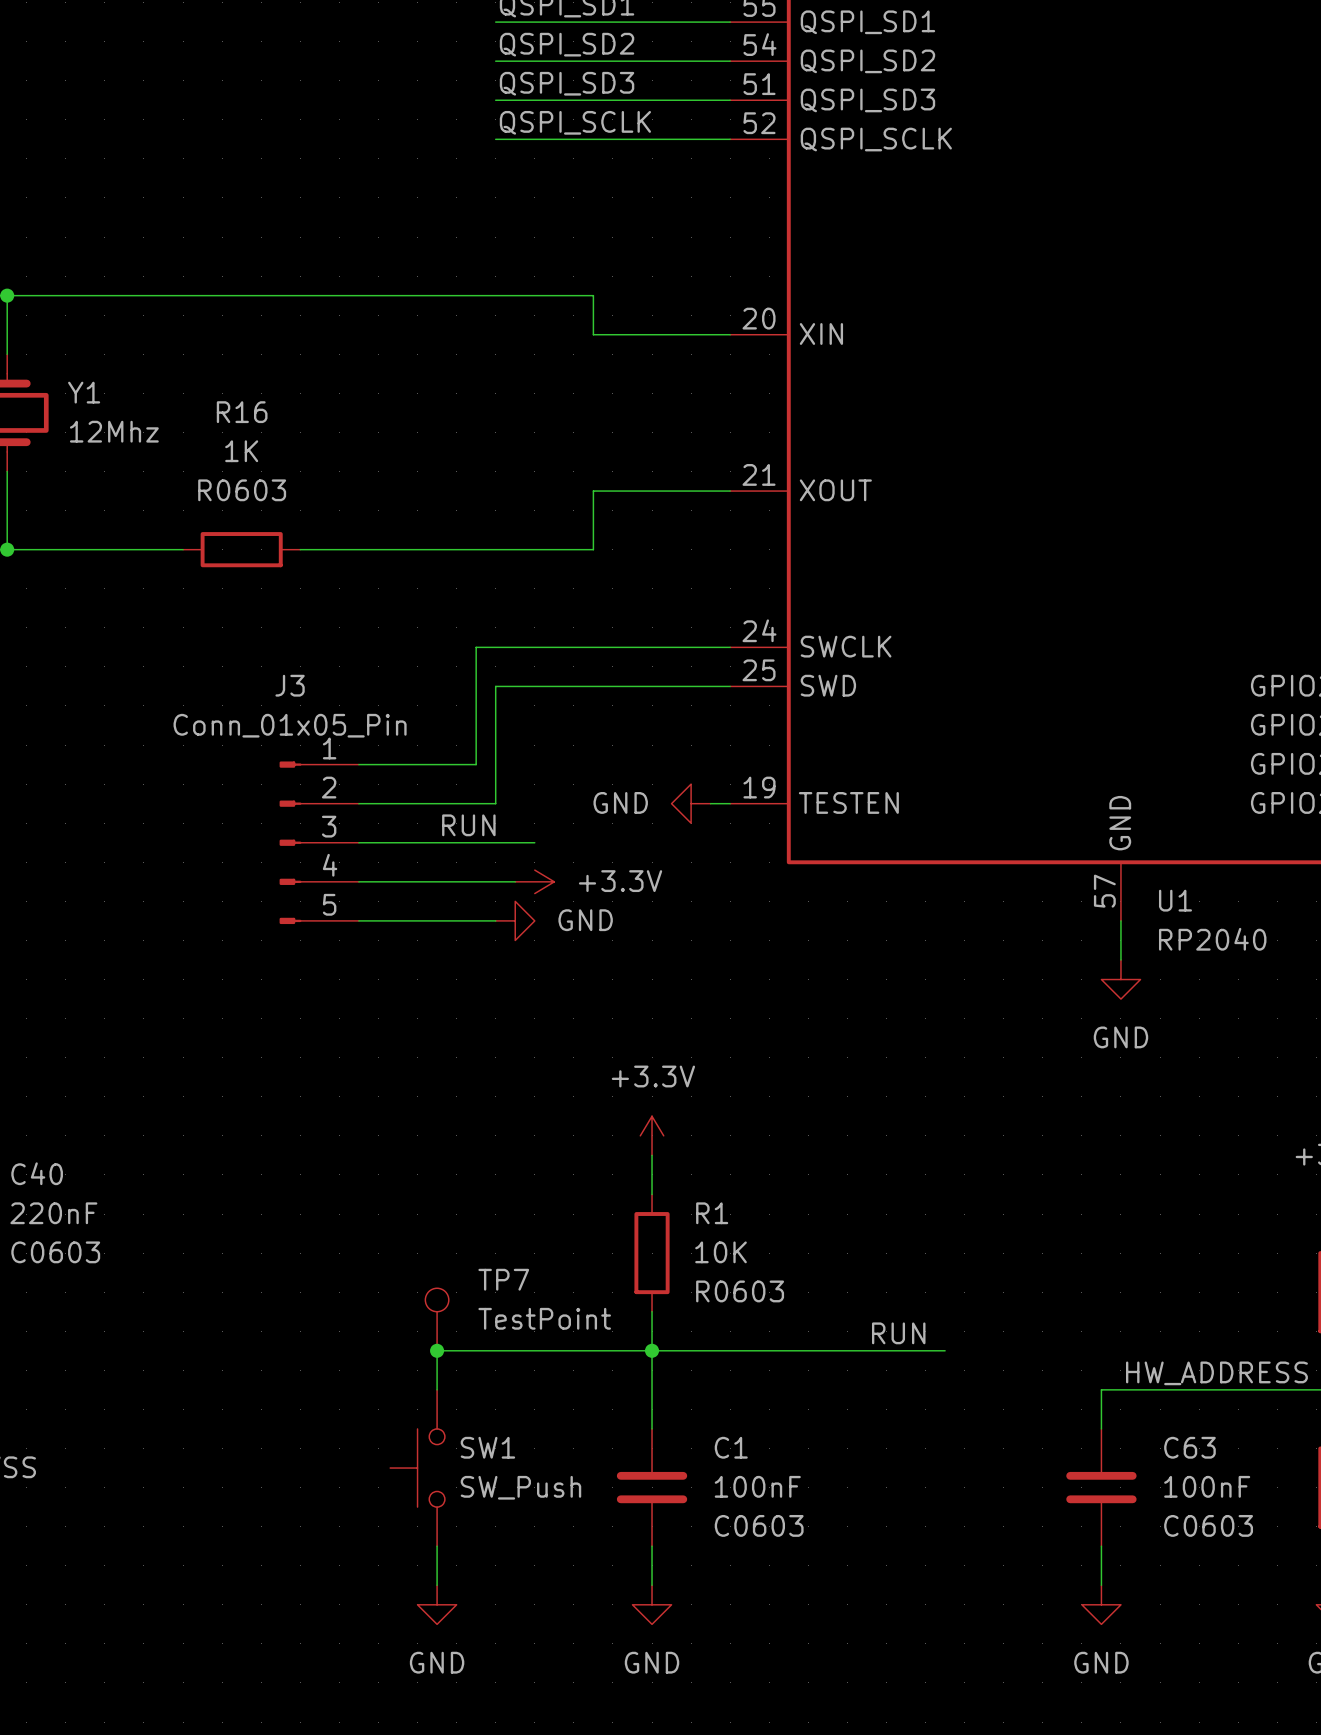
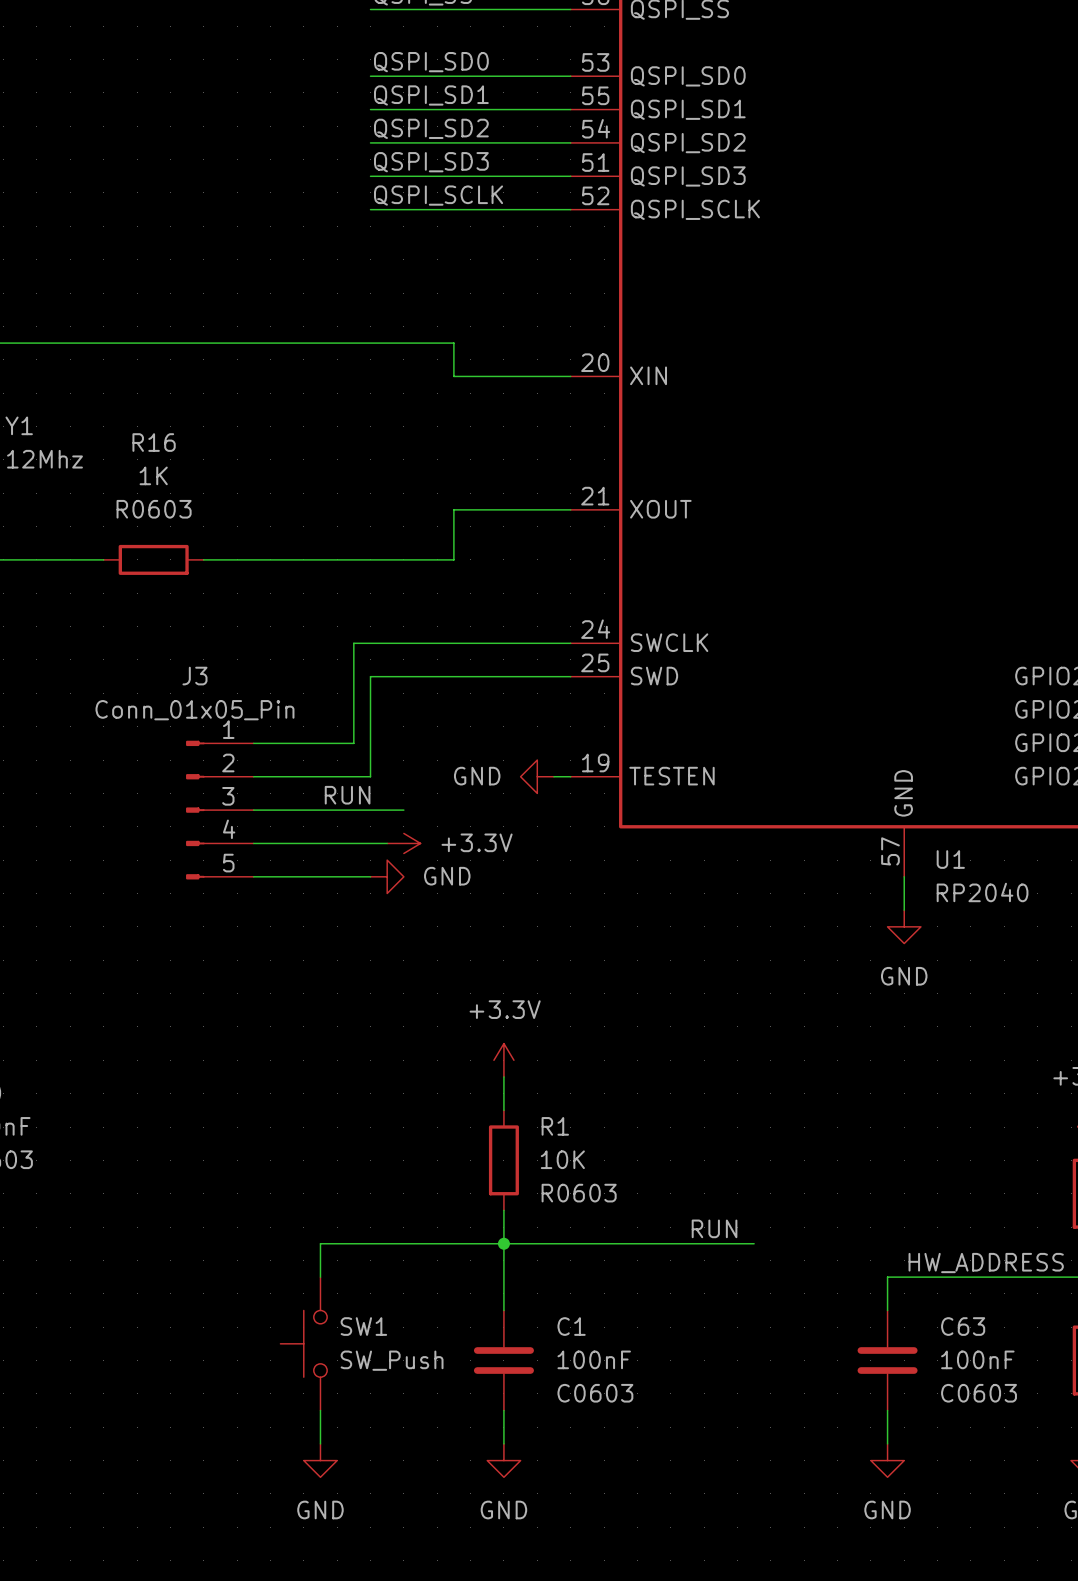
TP7: TestPoint (437, 1319) -> none
junction: (437, 1350) -> none

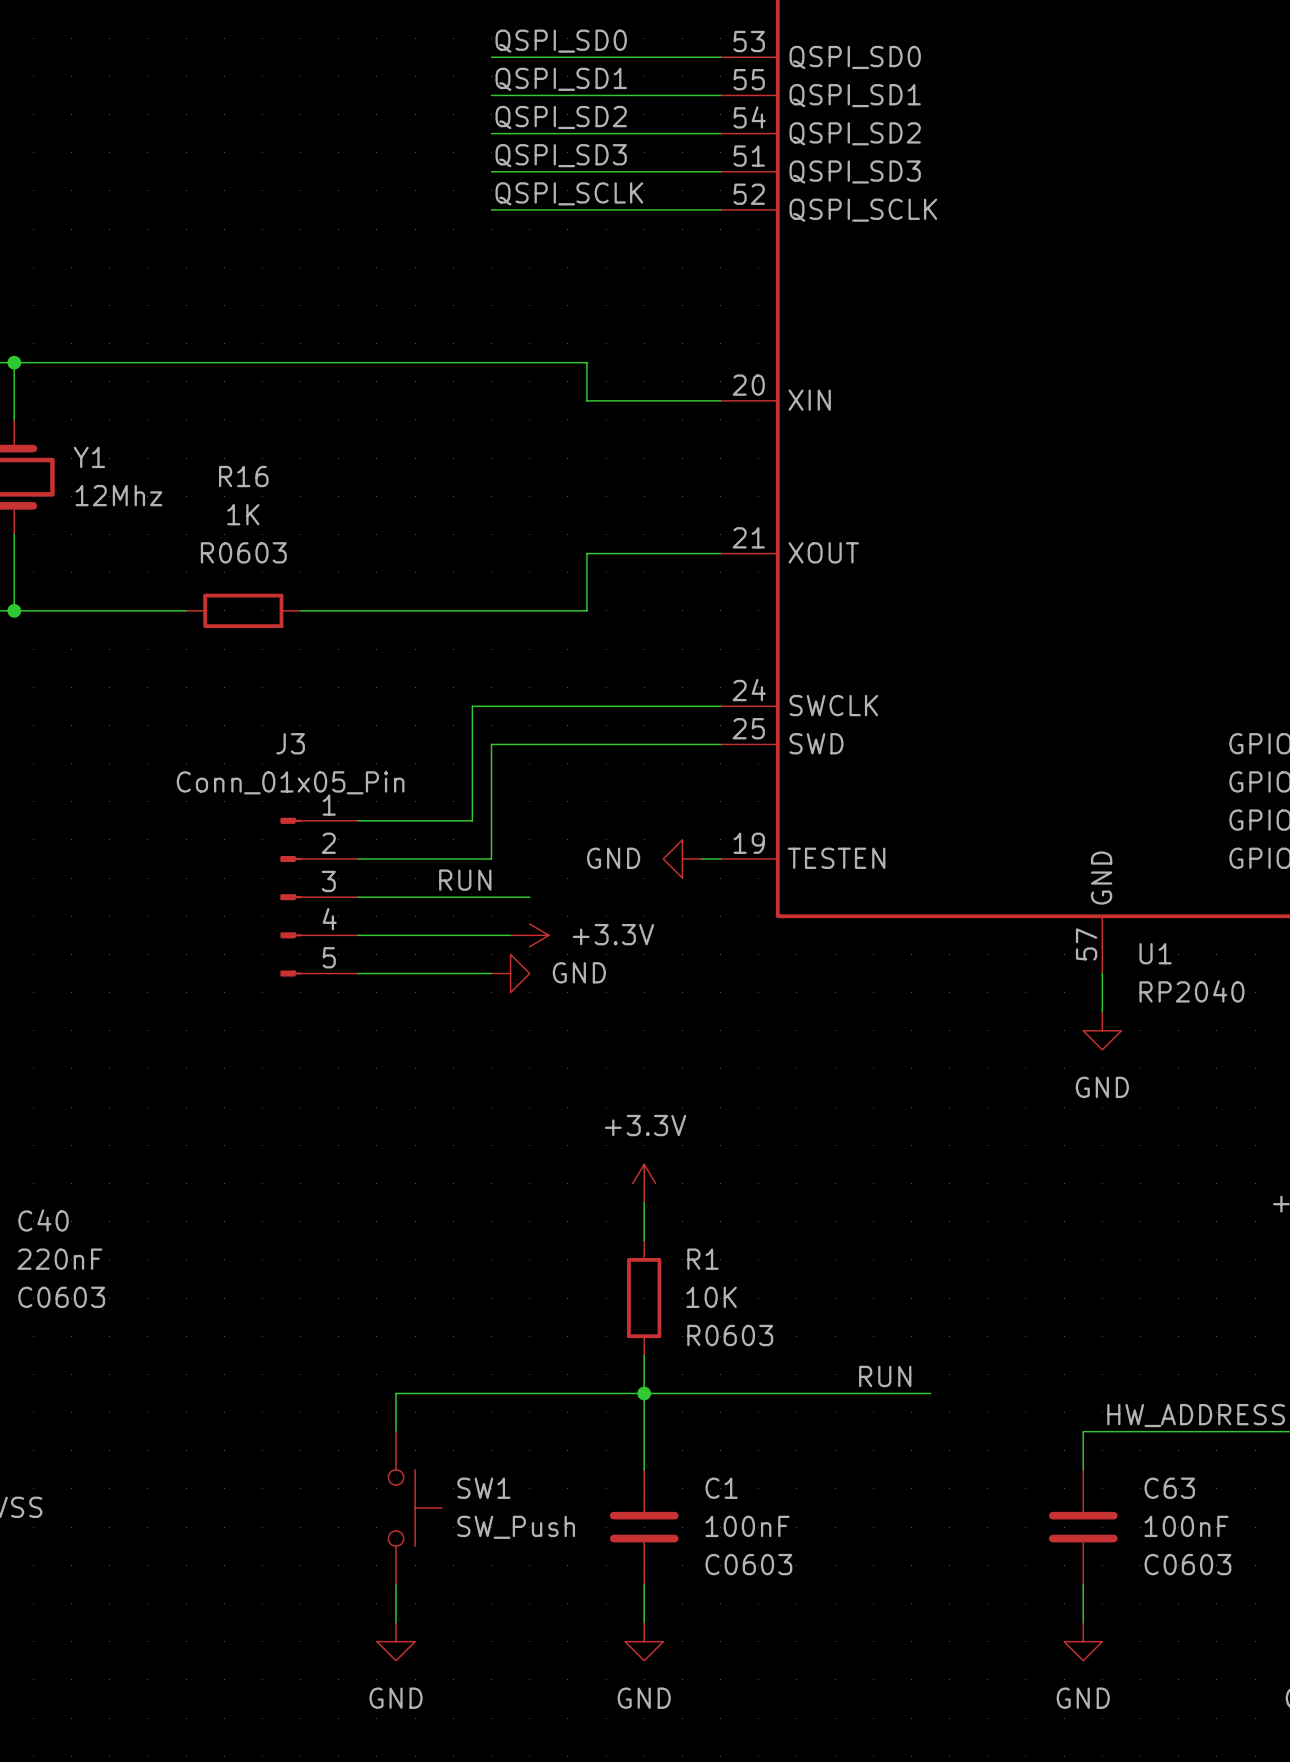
wire: (320, 1243) (320, 1277) -> (434, 1393) (396, 1393) (396, 1431)
SW1 rotation: 0° (303, 1343) -> 180° (415, 1508)
wire: (320, 1410) (320, 1443) -> (396, 1584) (396, 1622)
power symbol position: GND (320, 1460) -> GND (396, 1641)

